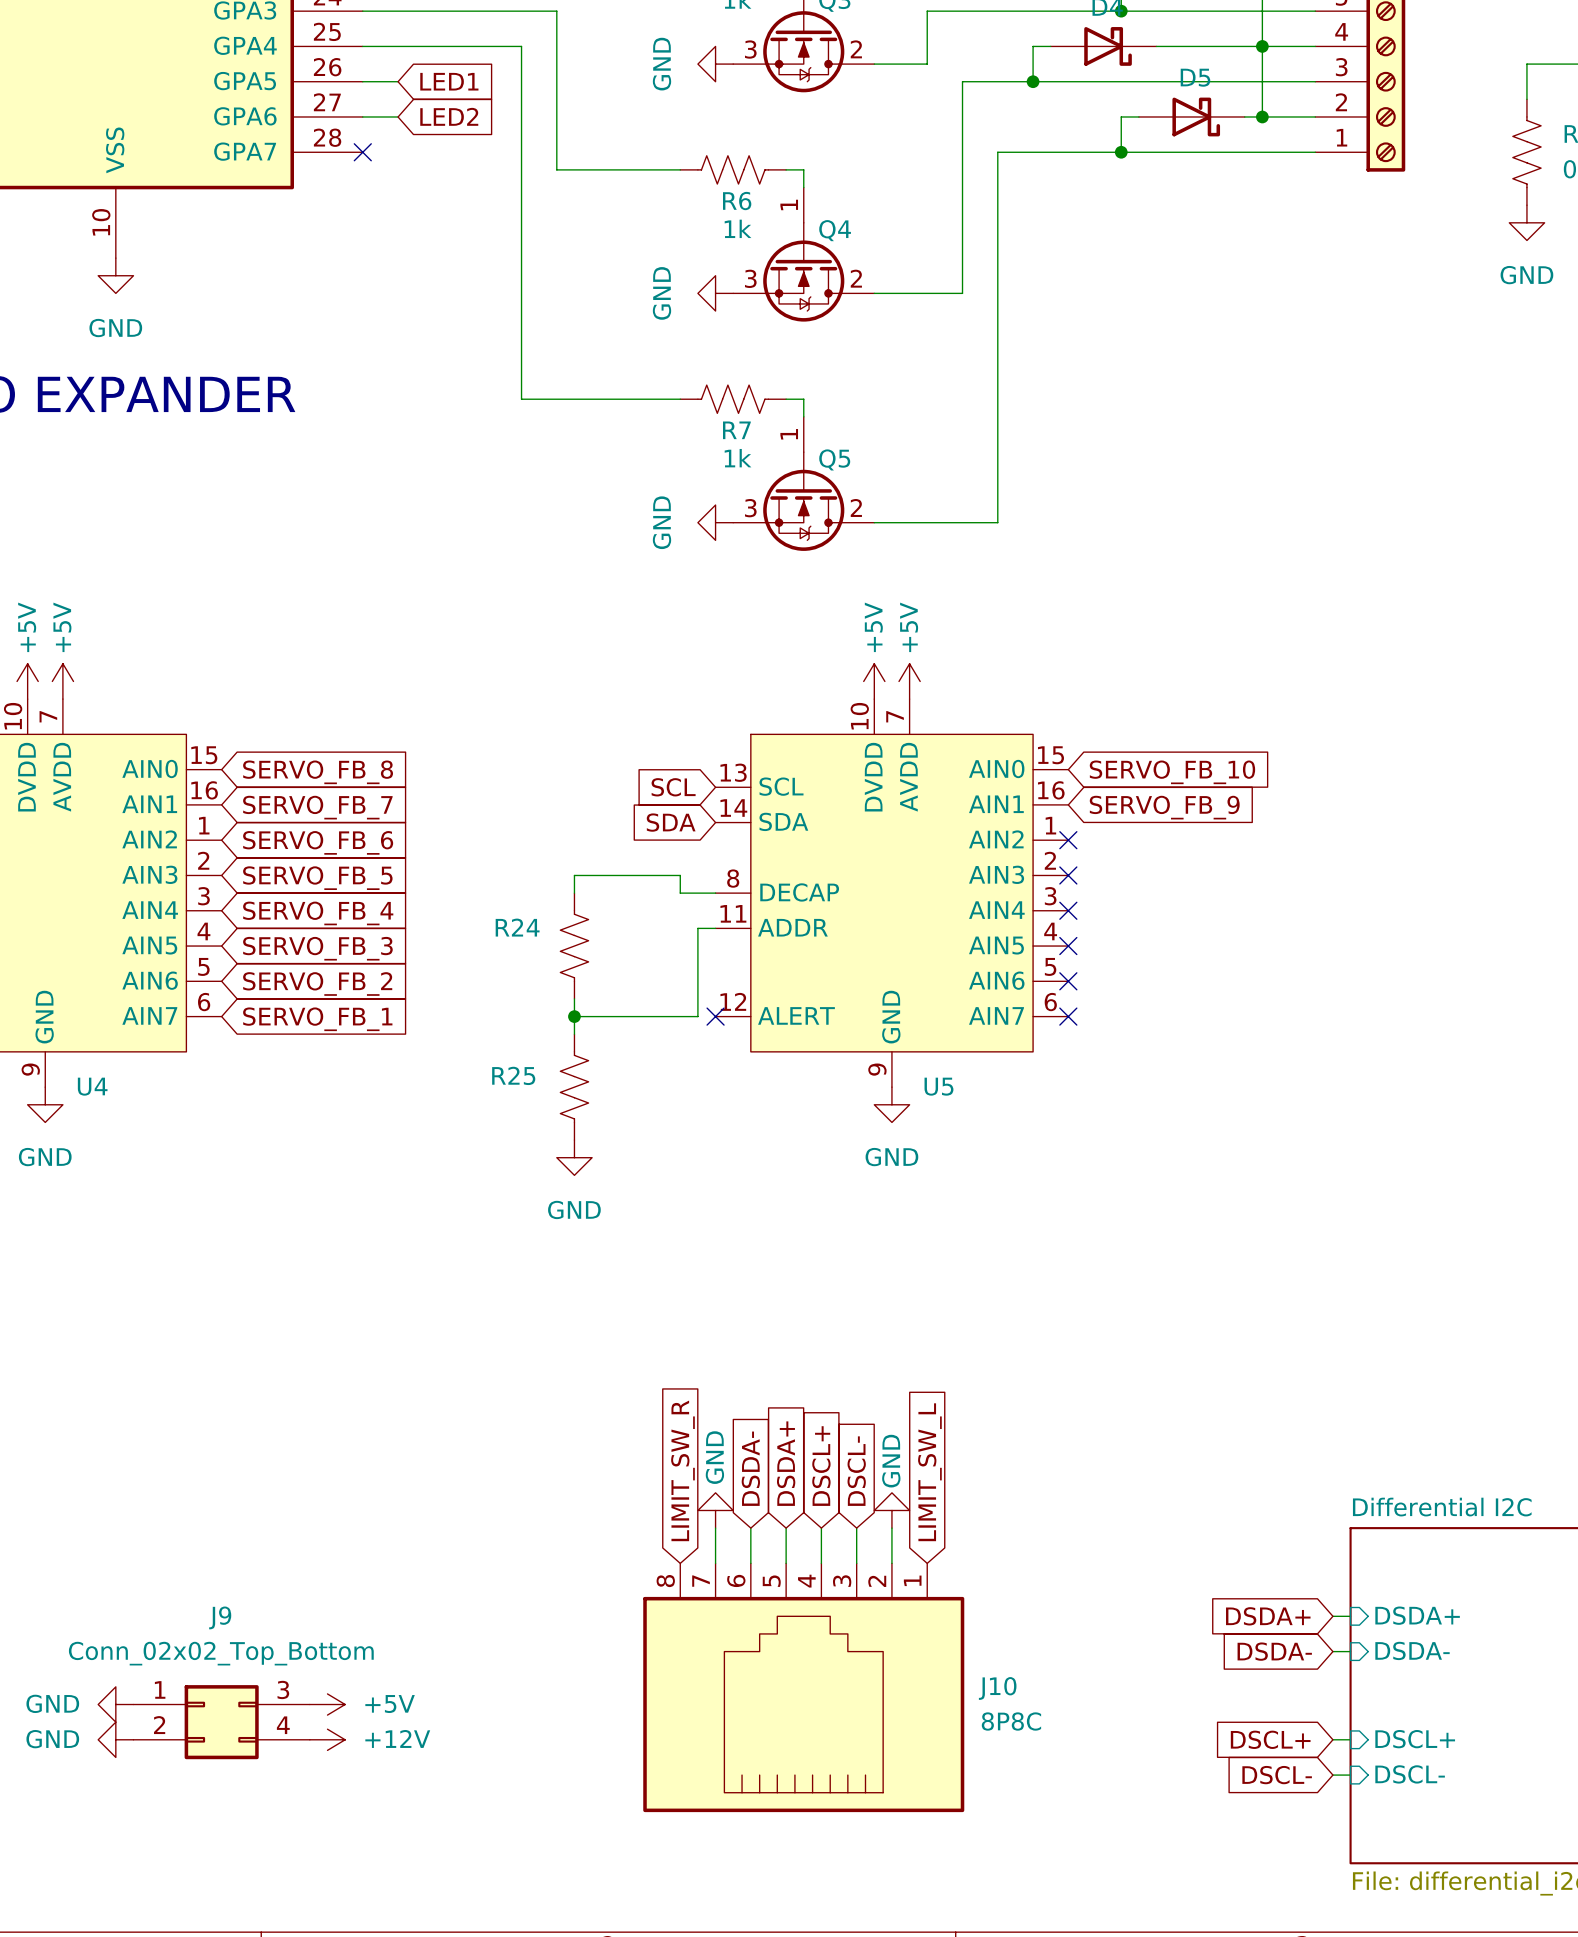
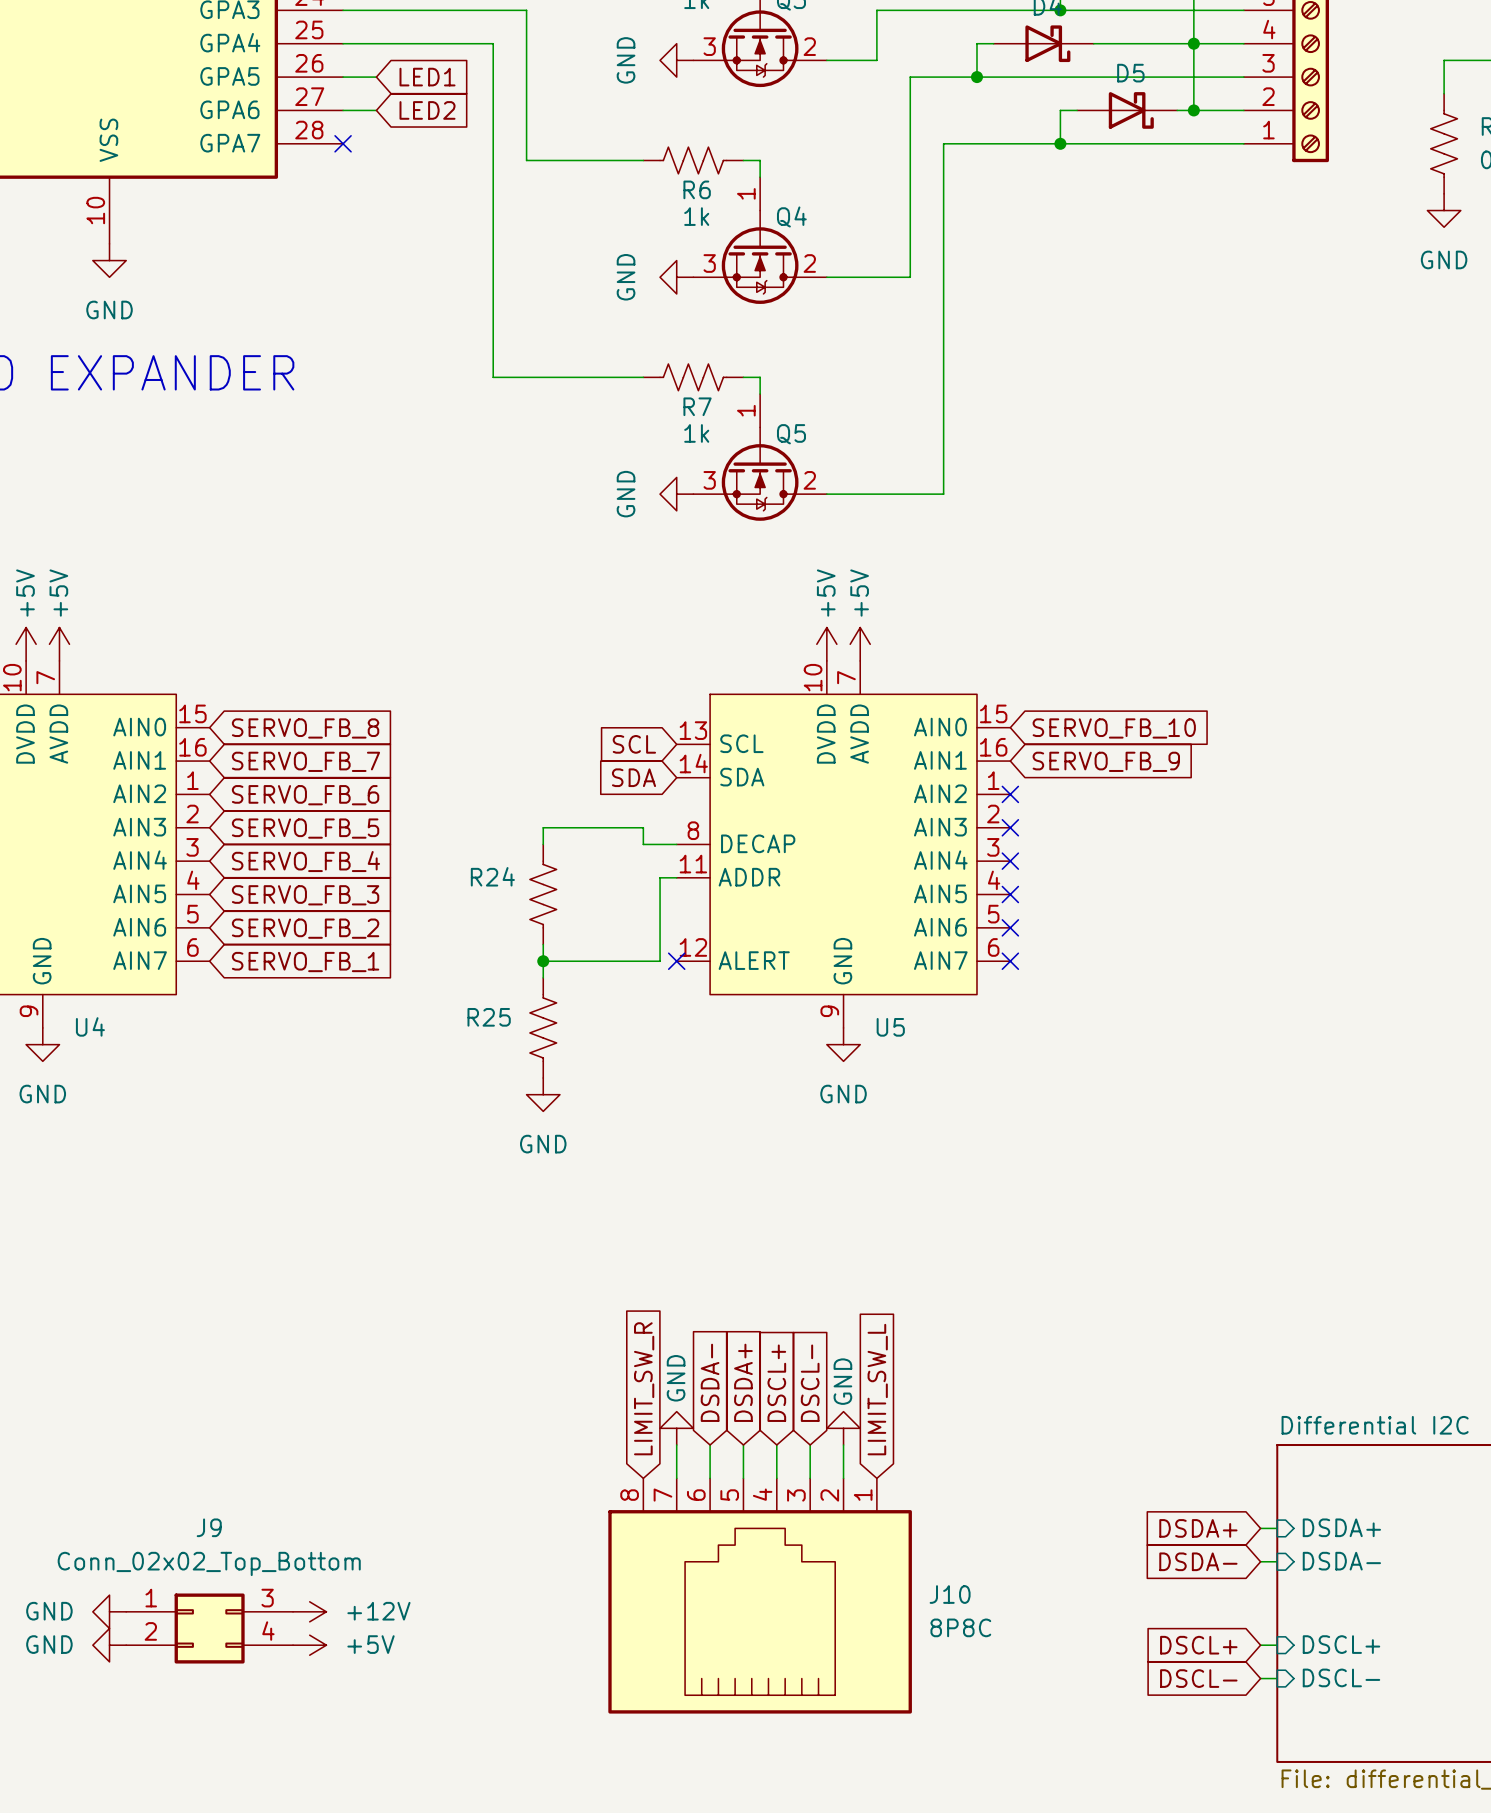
power symbol: +5V (327, 1704) -> +12V (309, 1611)
power symbol: +12V (327, 1739) -> +5V (309, 1645)

